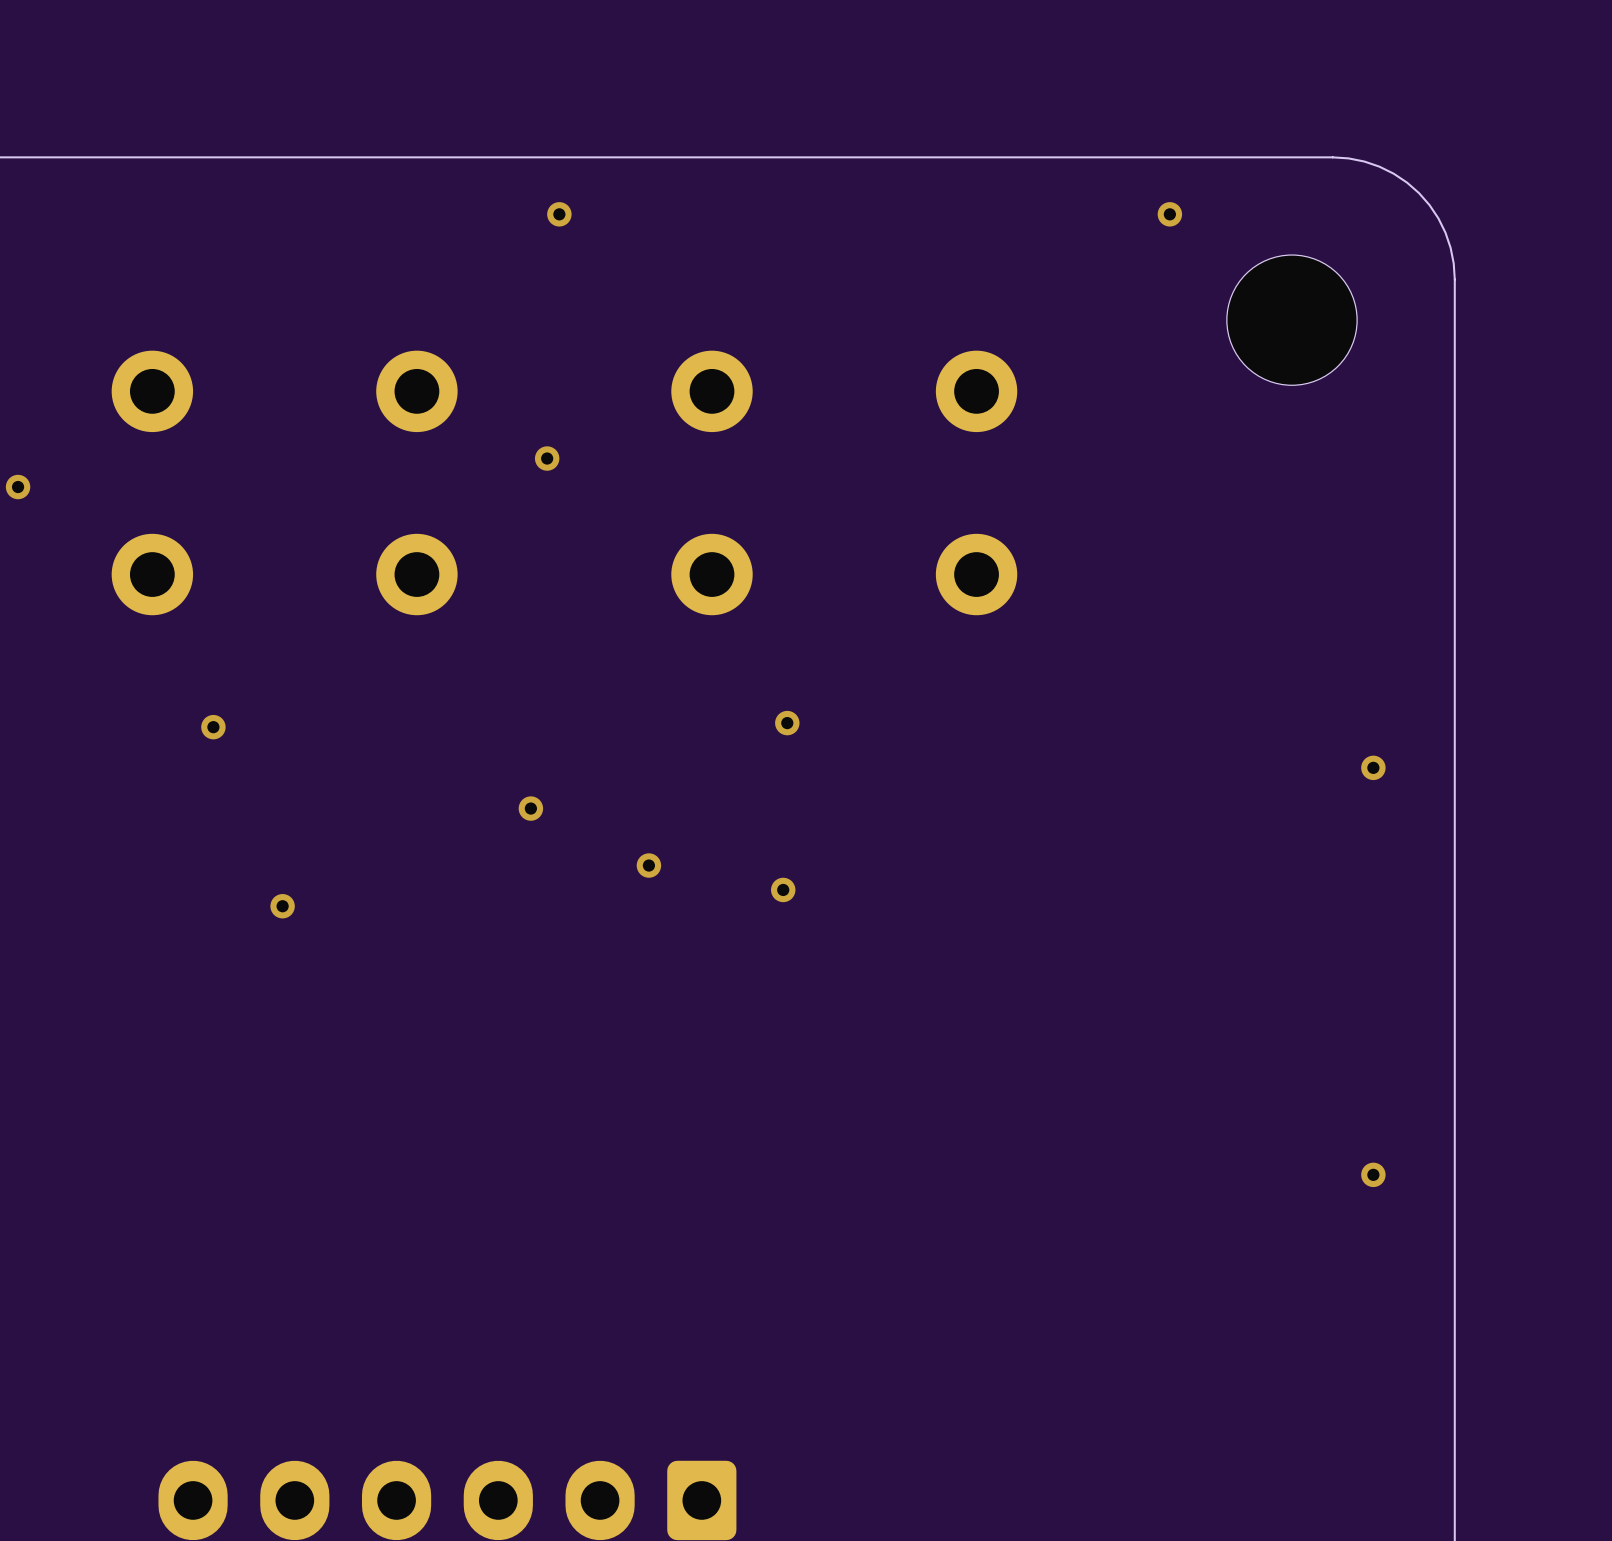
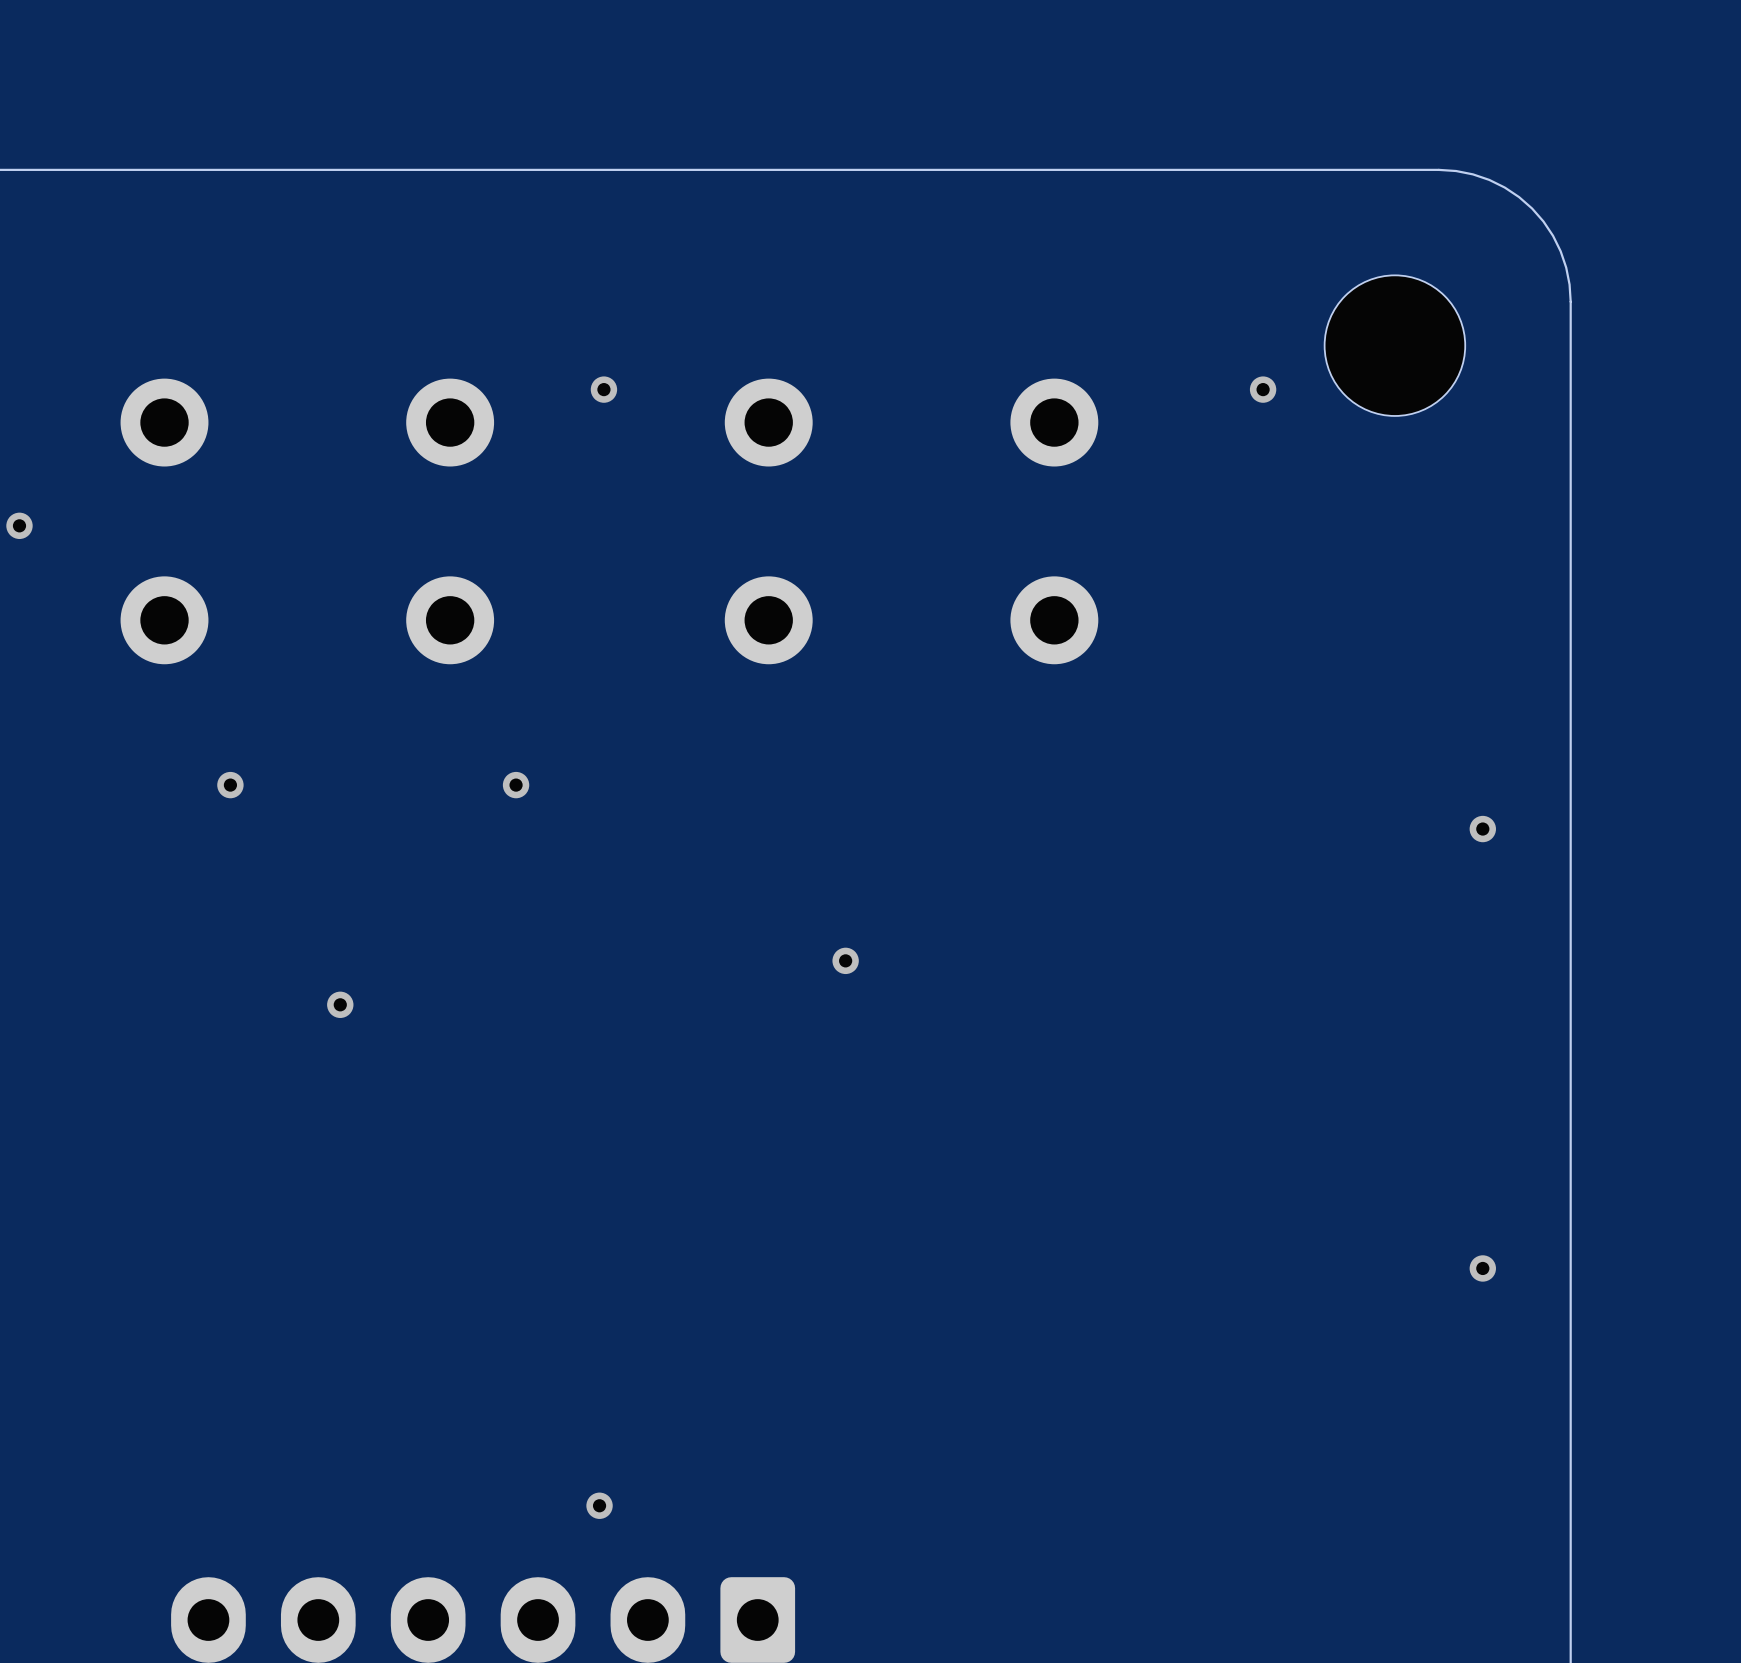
via: (559, 214) -> none
via position: (1169, 214) -> (1263, 389)
via: none -> (603, 389)
via: (547, 458) -> none
via: (787, 723) -> none
via position: (530, 808) -> (516, 785)
via: (648, 865) -> none
via position: (282, 906) -> (340, 1004)
via: none -> (599, 1505)

